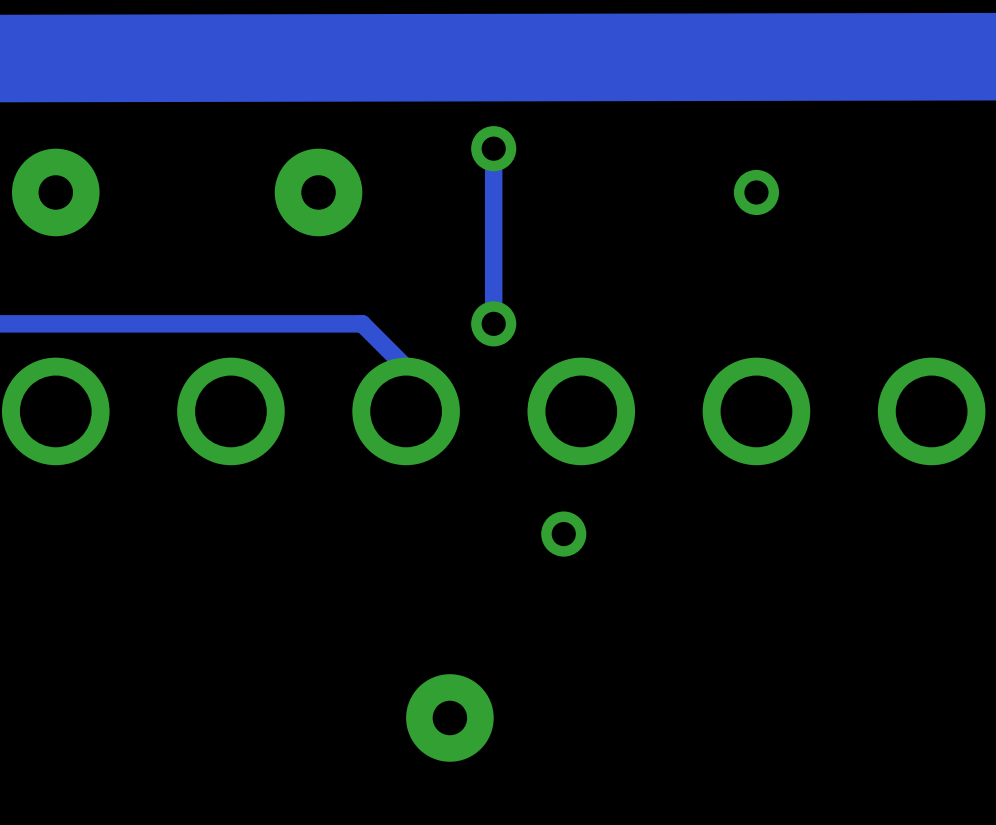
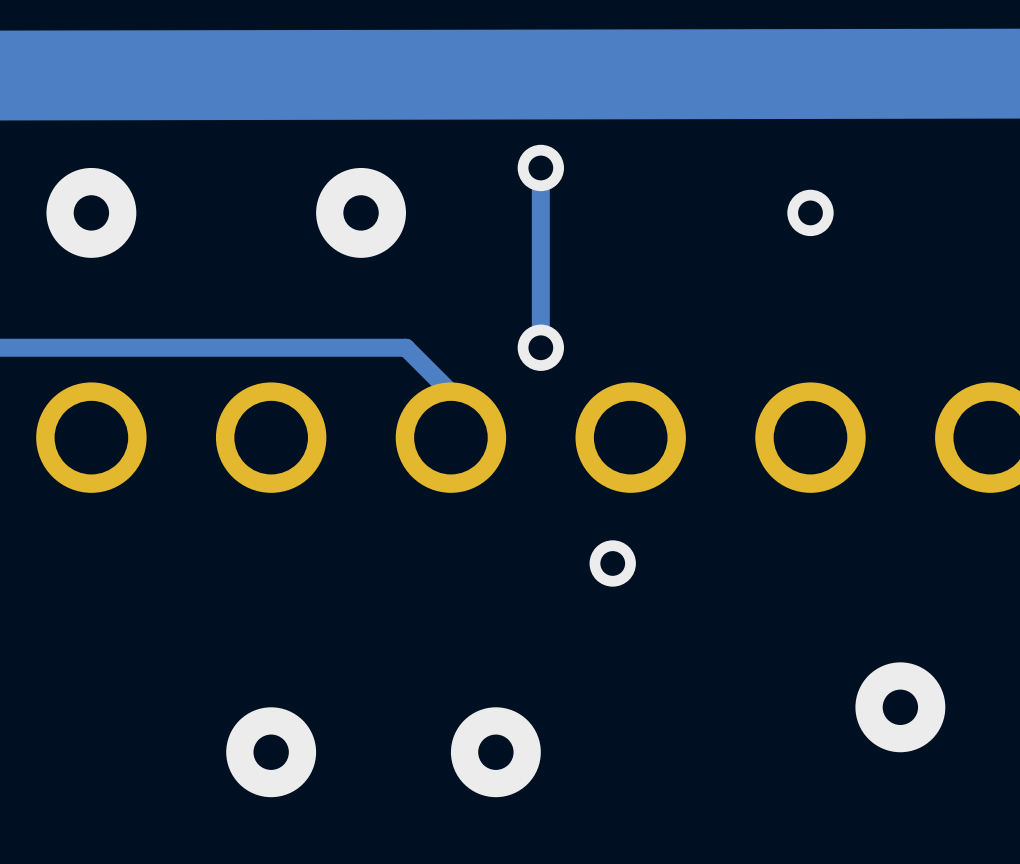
via: none -> (900, 707)
via: none -> (271, 752)

